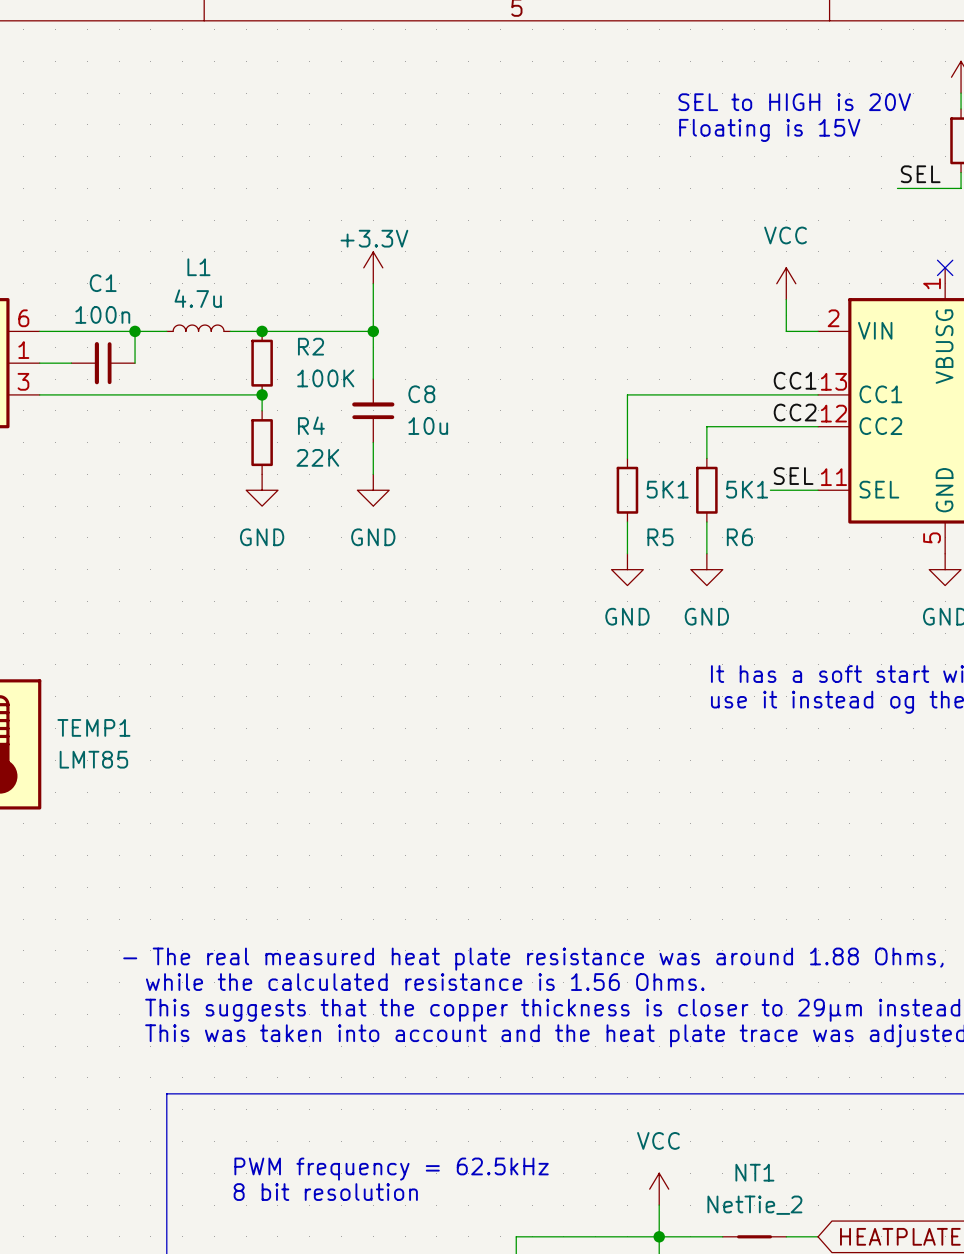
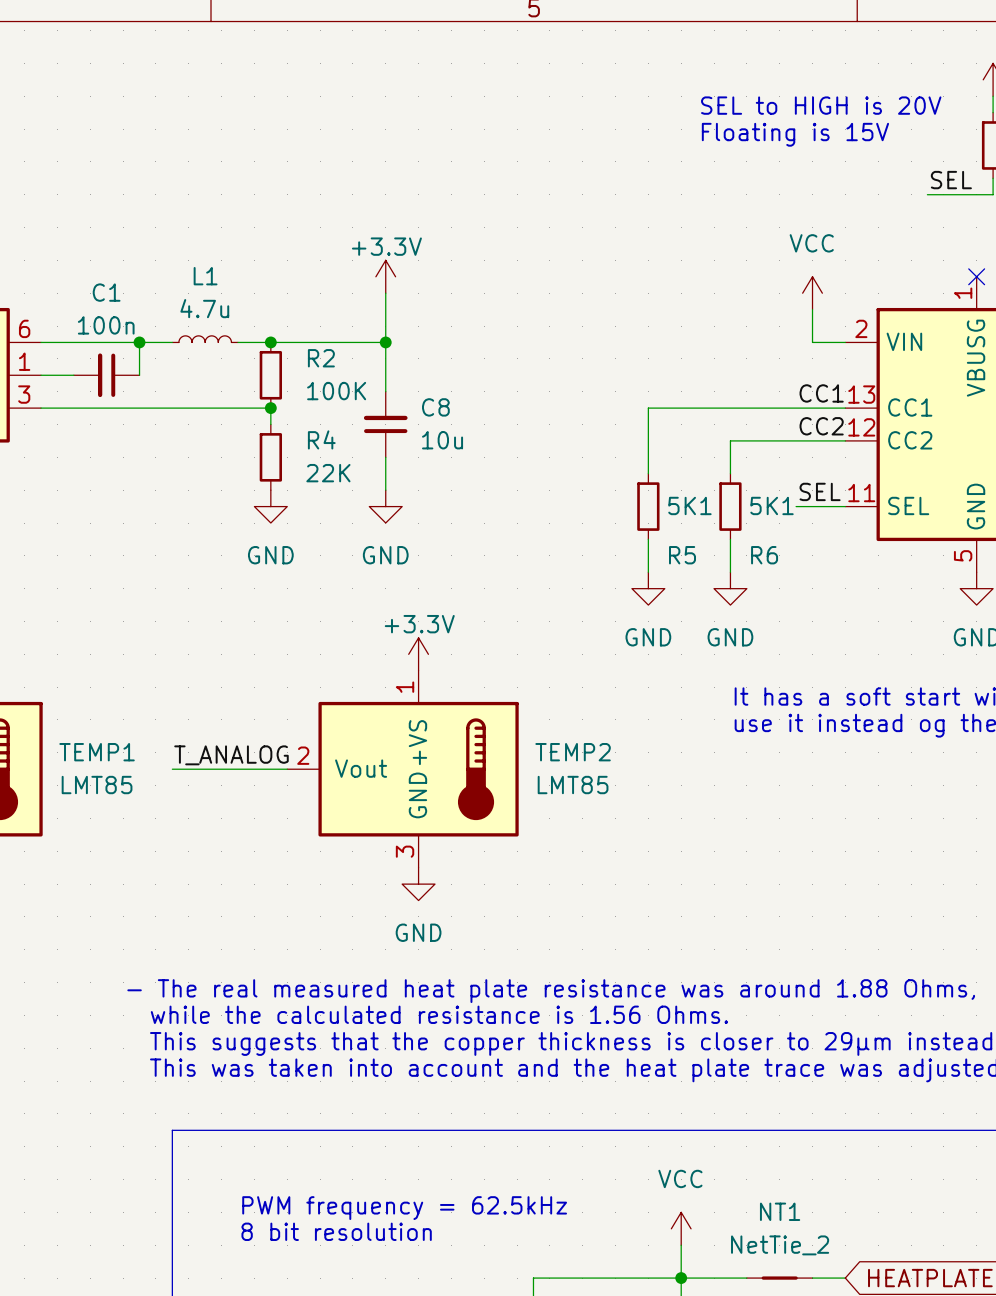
power symbol: none -> +3.3V (418, 654)
label: none -> T_ANALOG (231, 755)
wire: none -> (172, 769) (287, 769)
TEMP2: none -> LMT85 (402, 769)
power symbol: none -> GND (418, 884)

